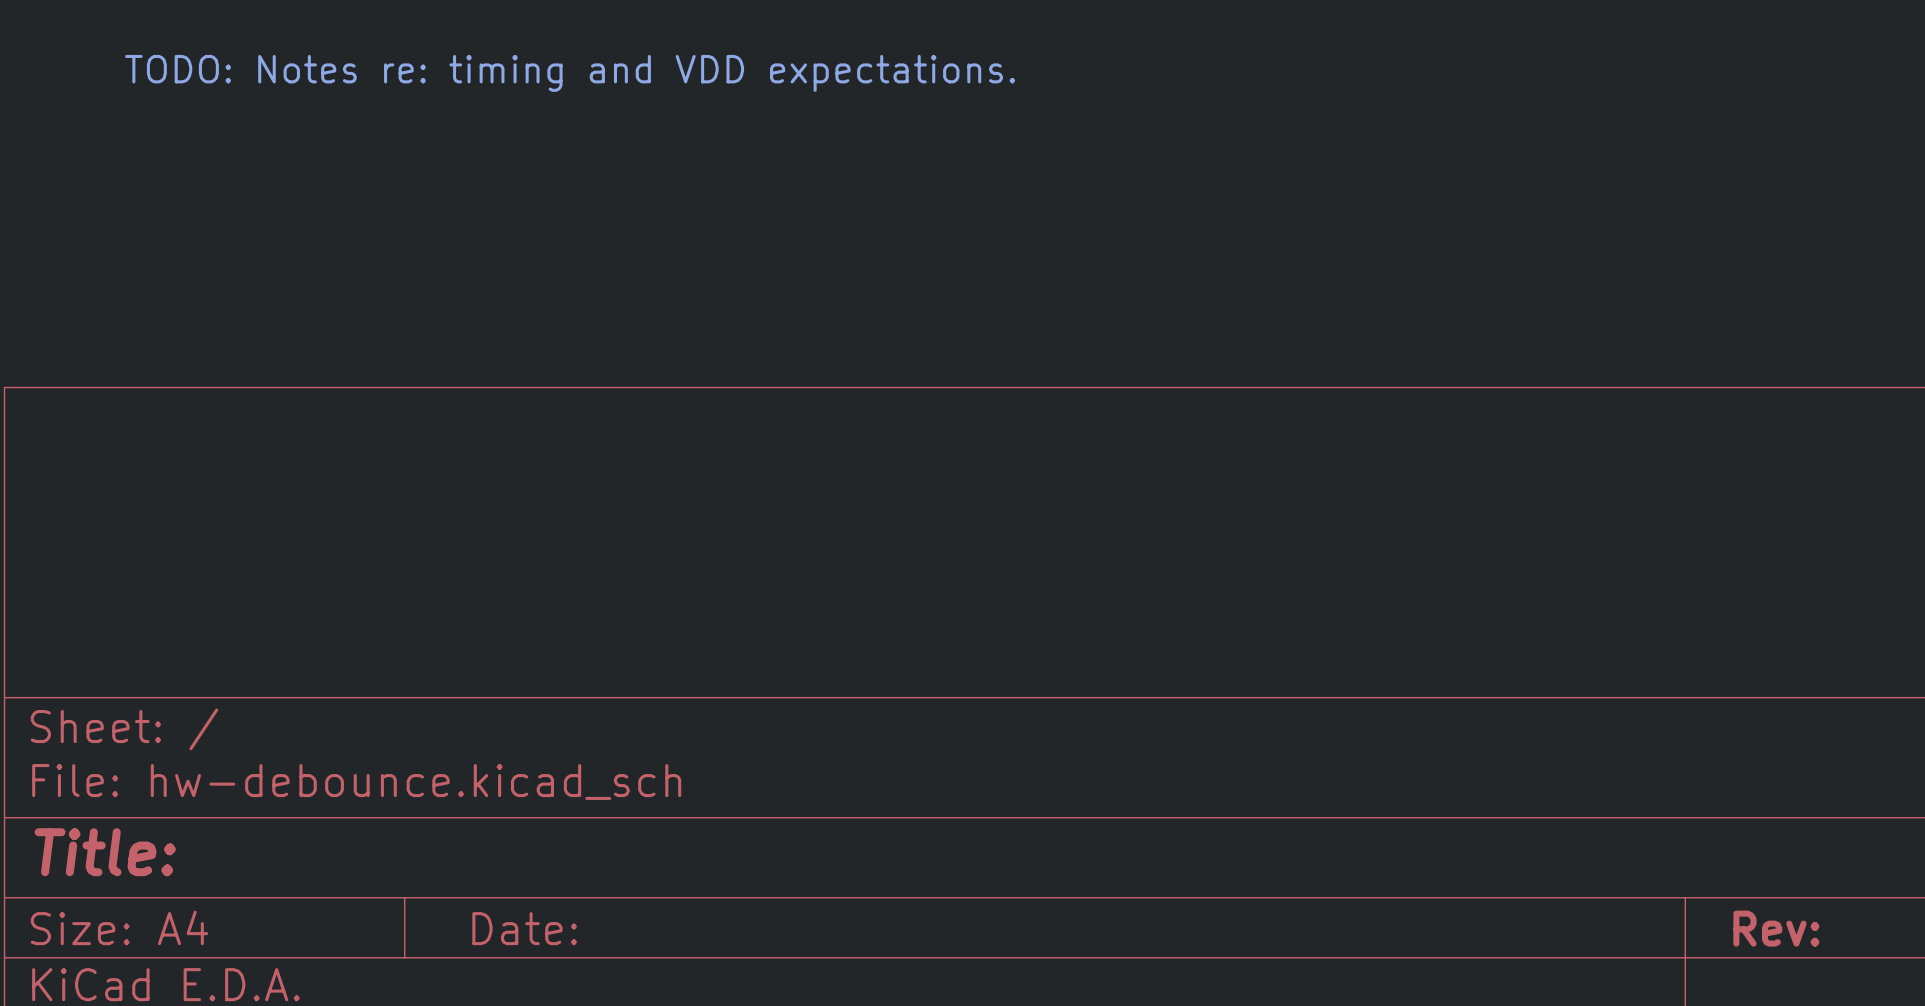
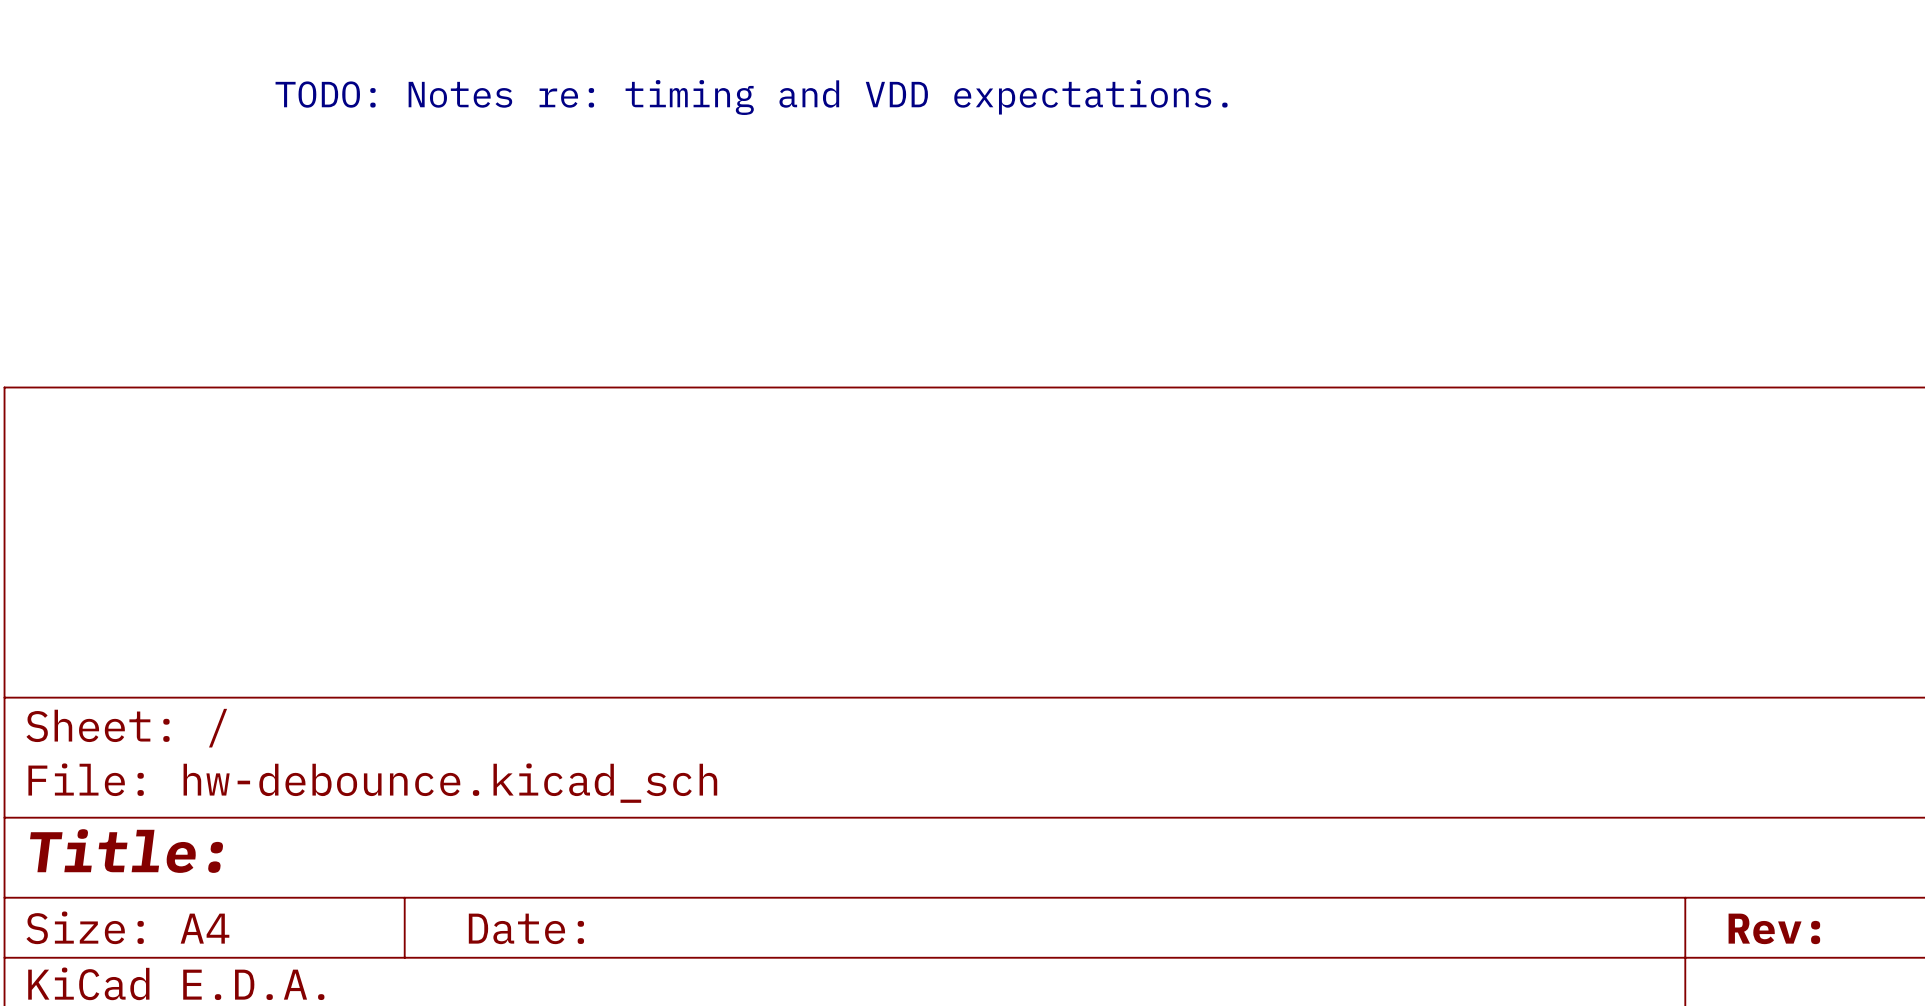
text position: TODO: Notes re: timing and VDD expectations. (570, 73) -> TODO: Notes re: timing and VDD expectations. (751, 97)

